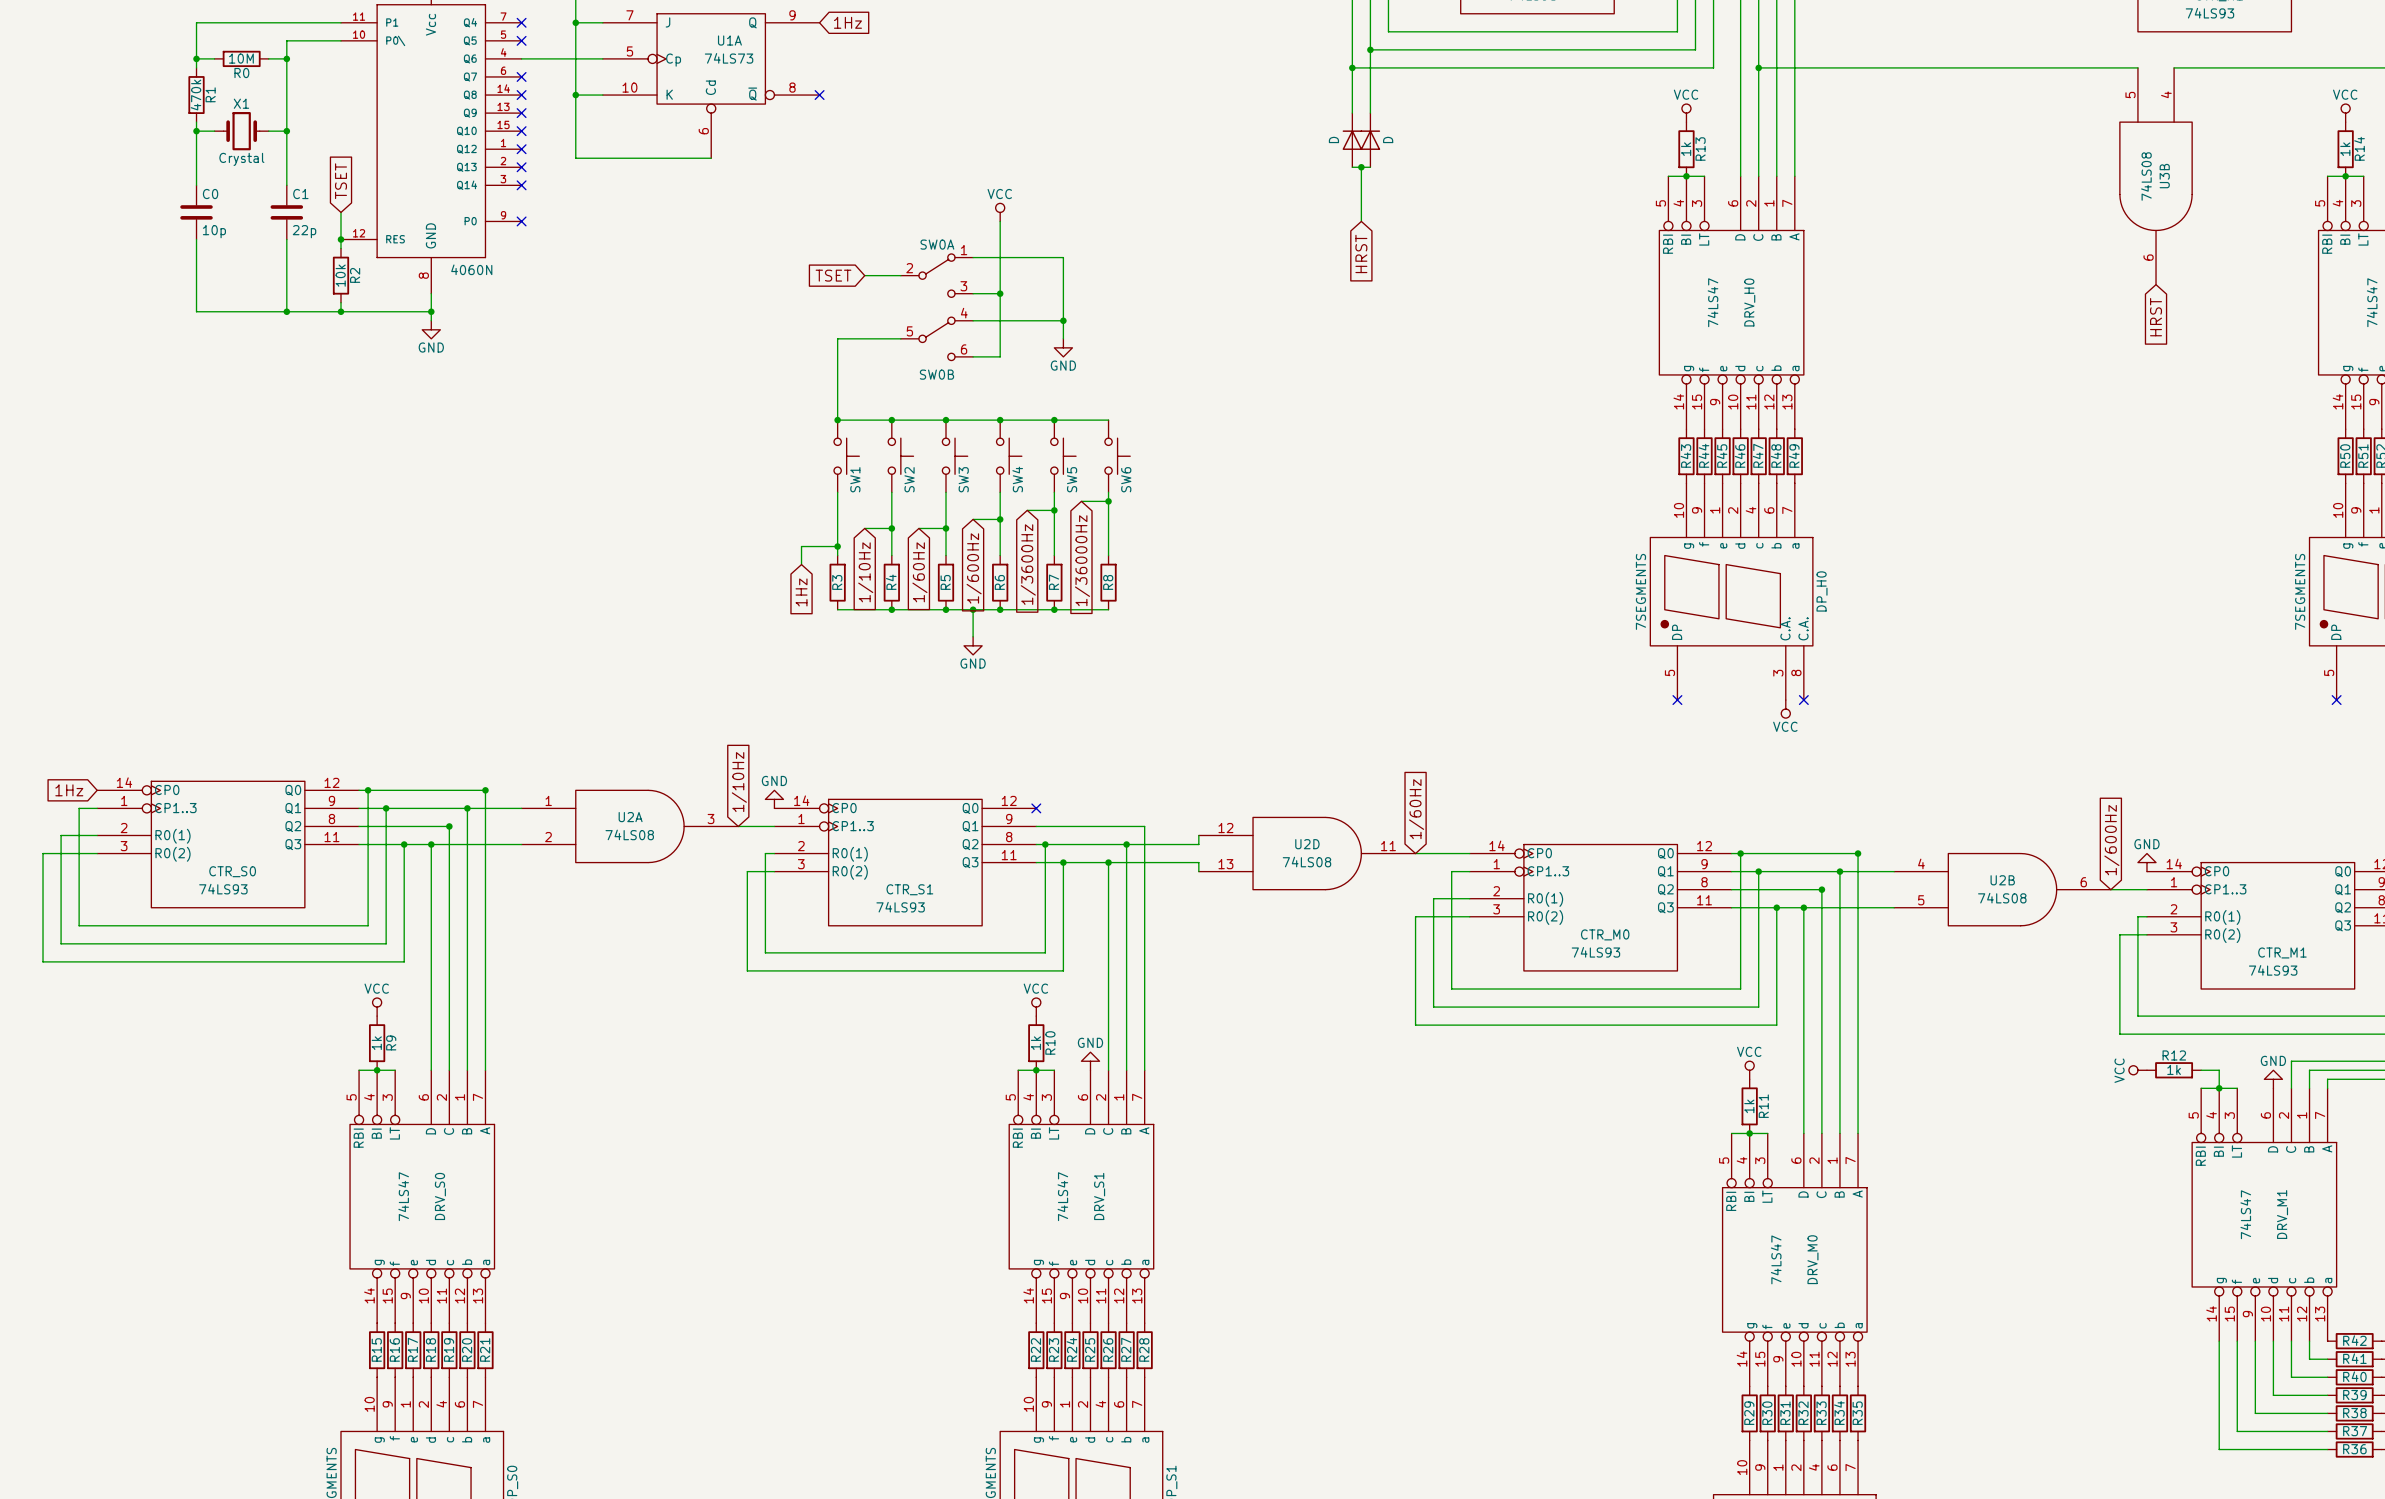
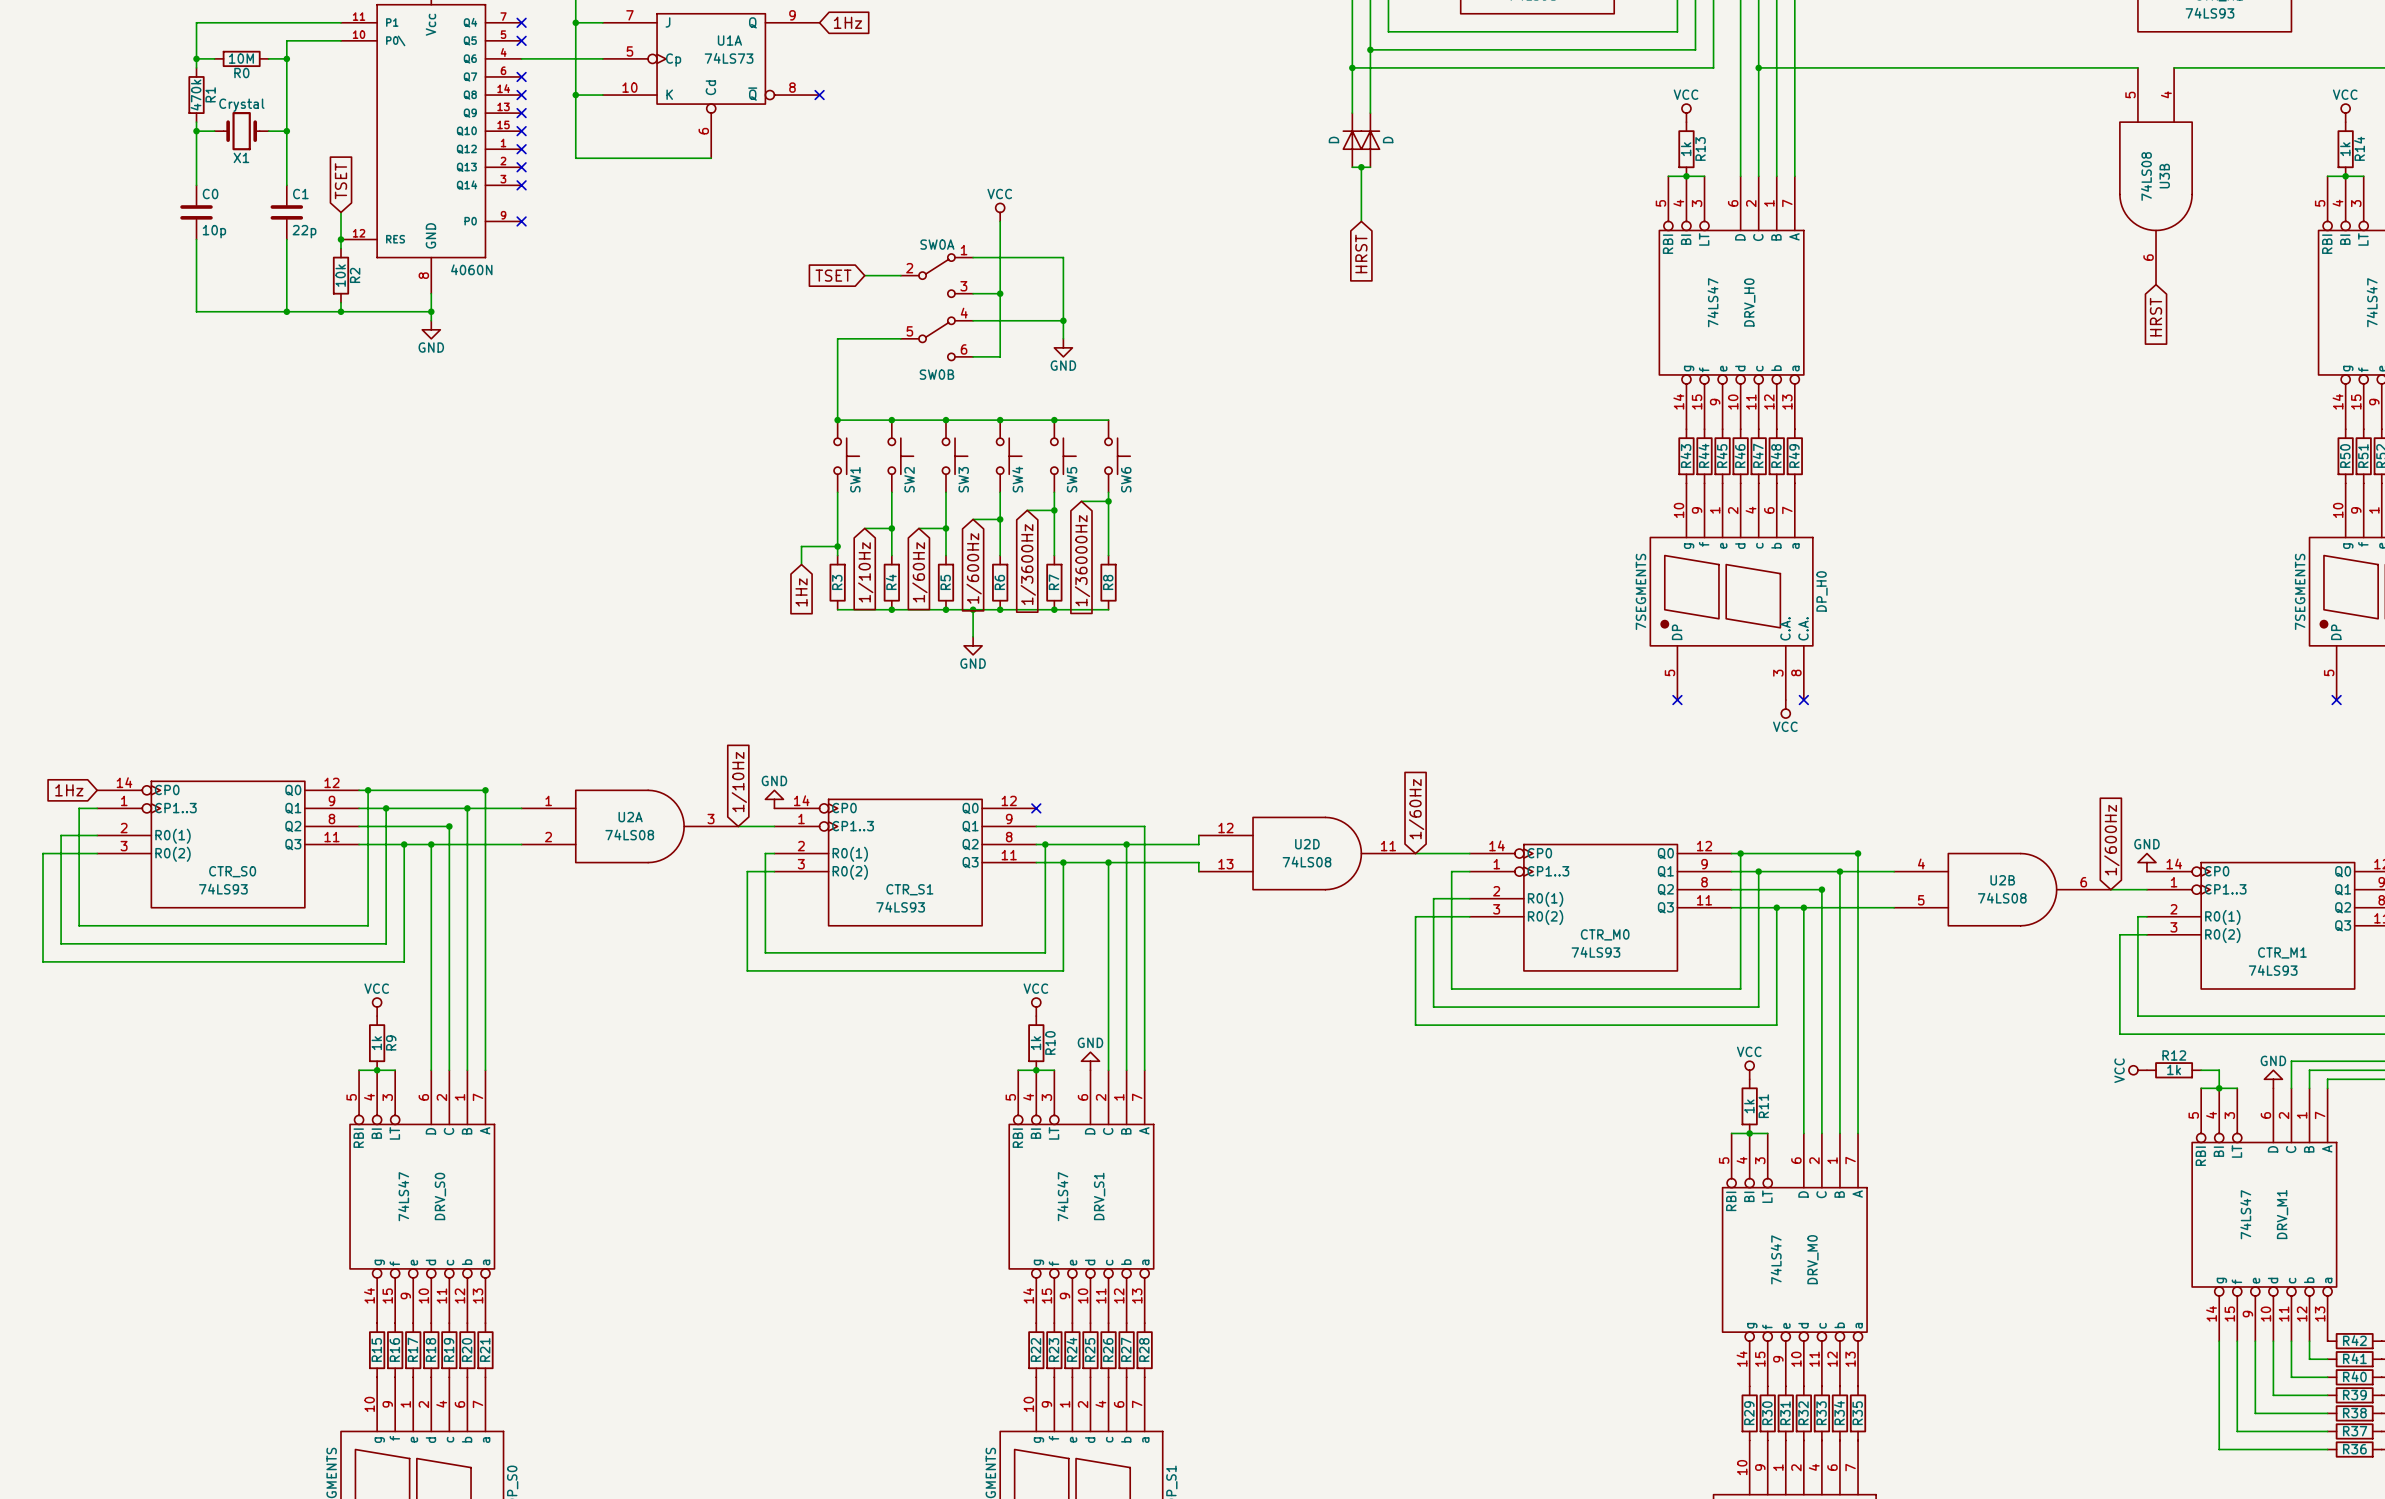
X1 name position: X1 (241, 103) -> X1 (241, 157)
X1 value position: Crystal (241, 159) -> Crystal (241, 105)

